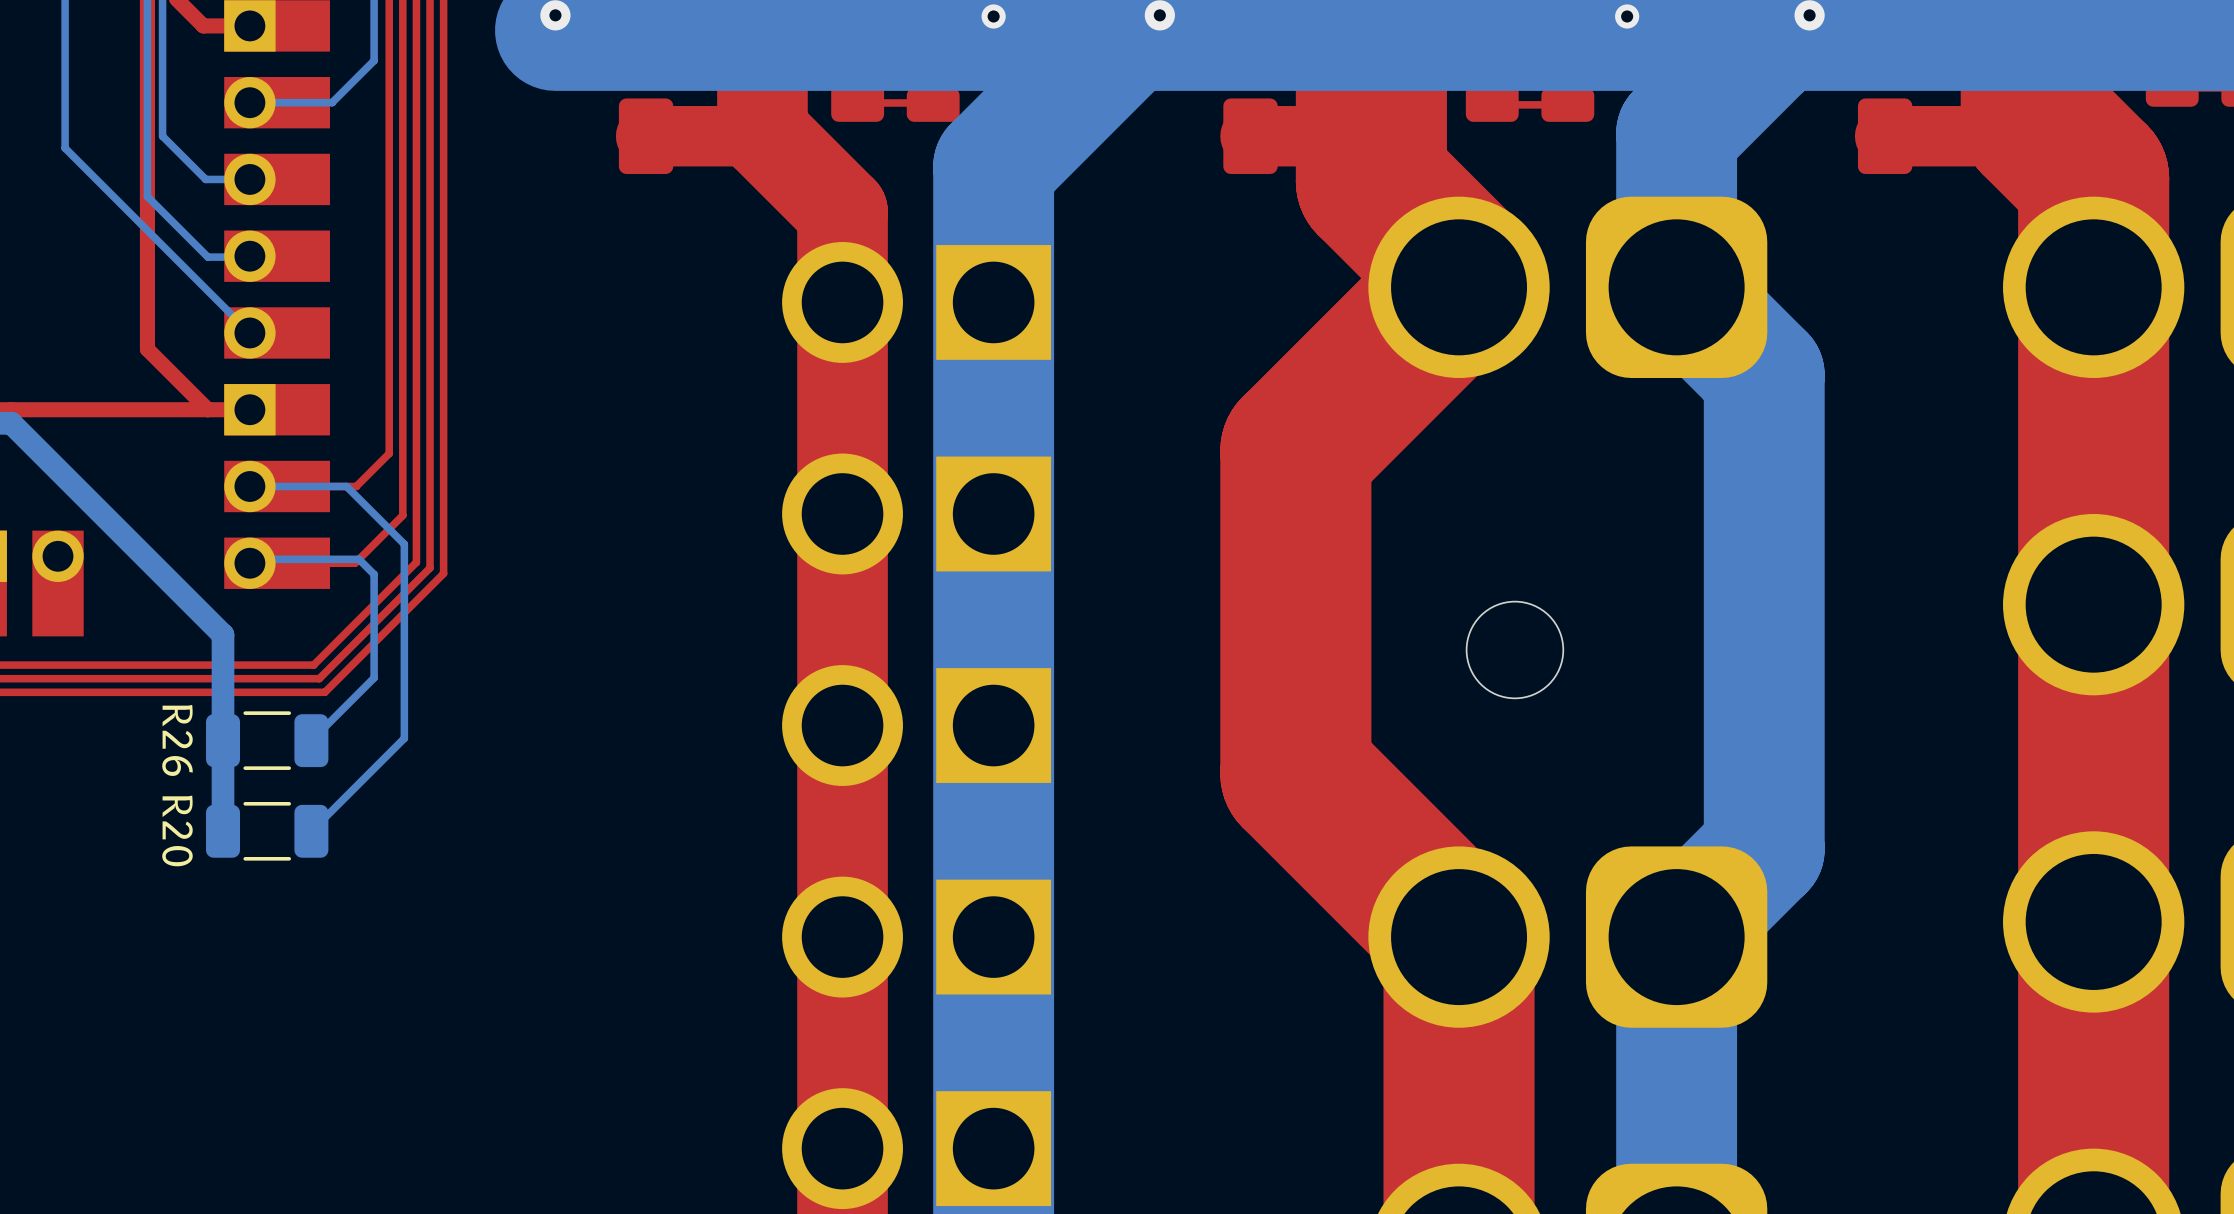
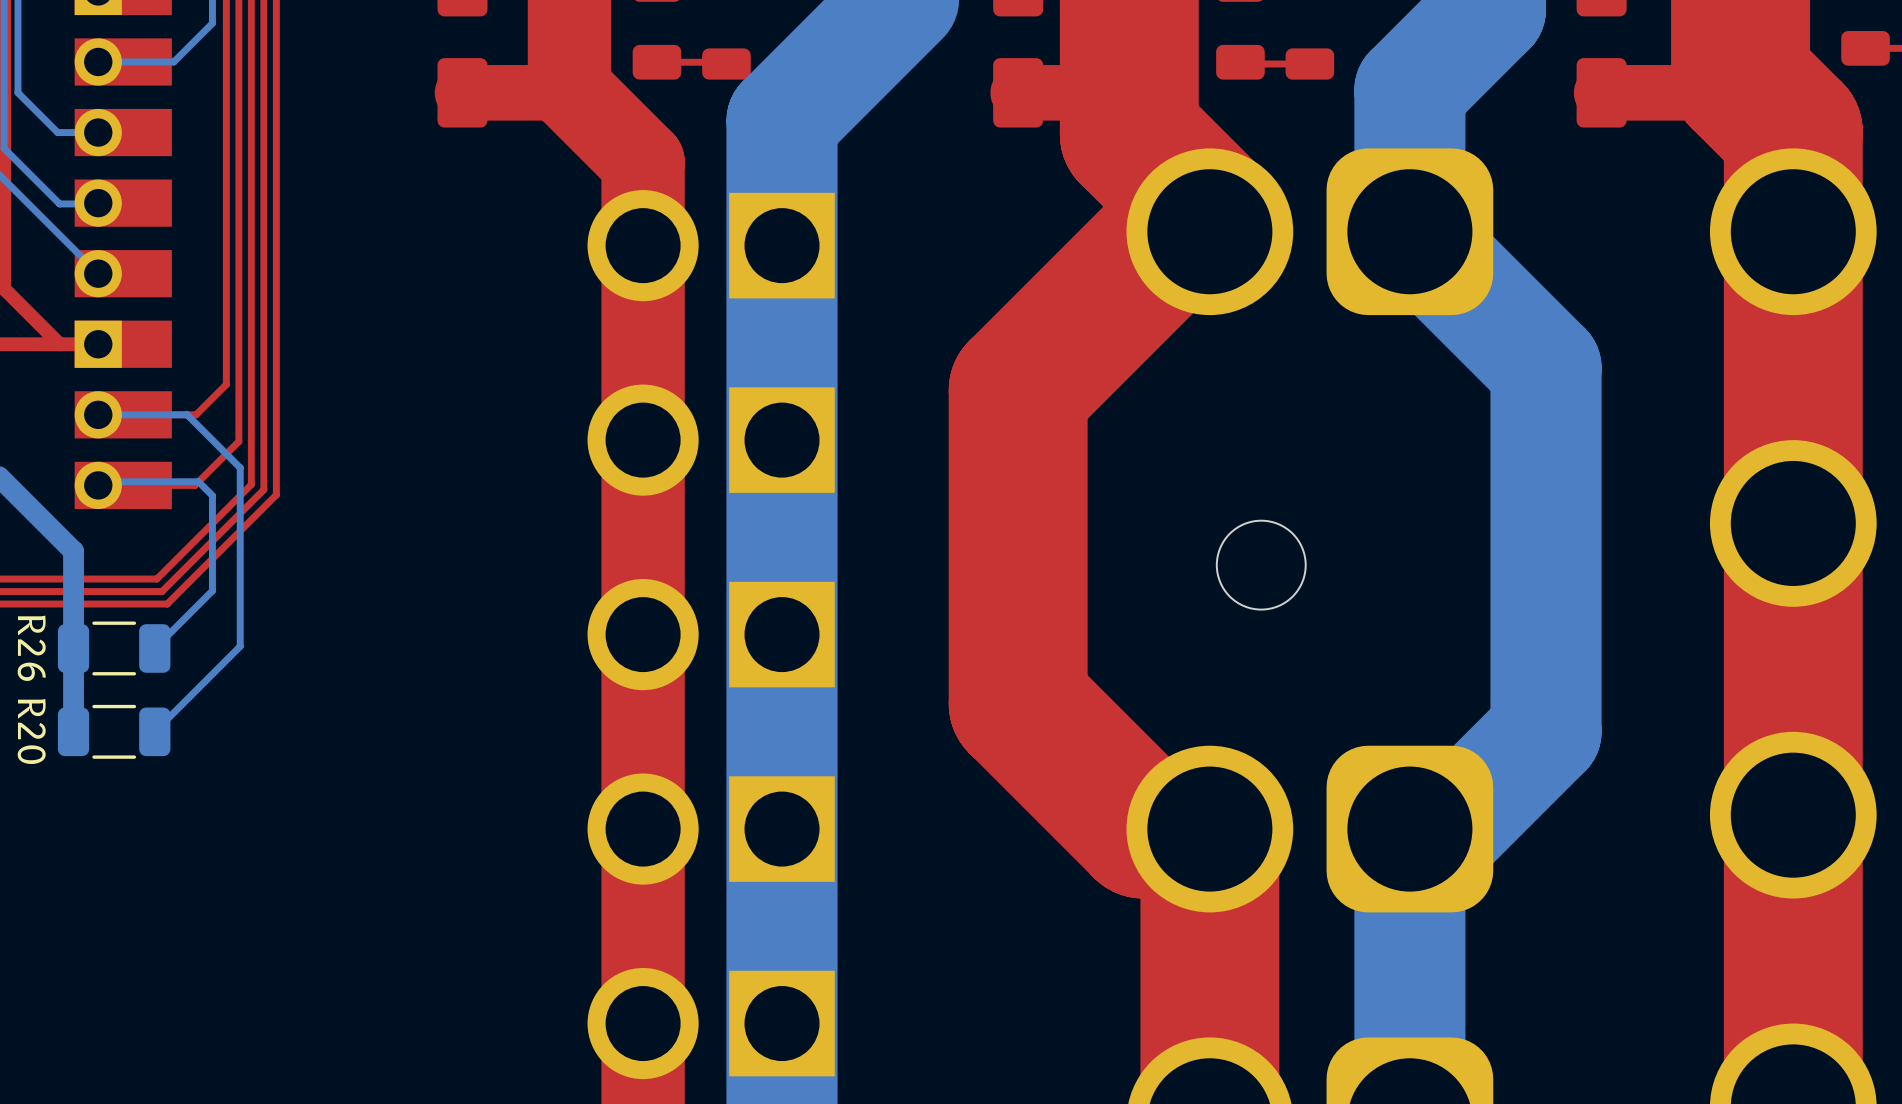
top track: (1459, 287) (1295, 450) (1295, 773) (1459, 937) -> (1209, 231) (1176, 231) (1018, 390) (1018, 704) (1143, 829) (1209, 829)
bottom track: (1764, 374) (1764, 849) (1676, 937) -> (1490, 312) (1546, 367) (1546, 731) (1448, 829) (1409, 829)

